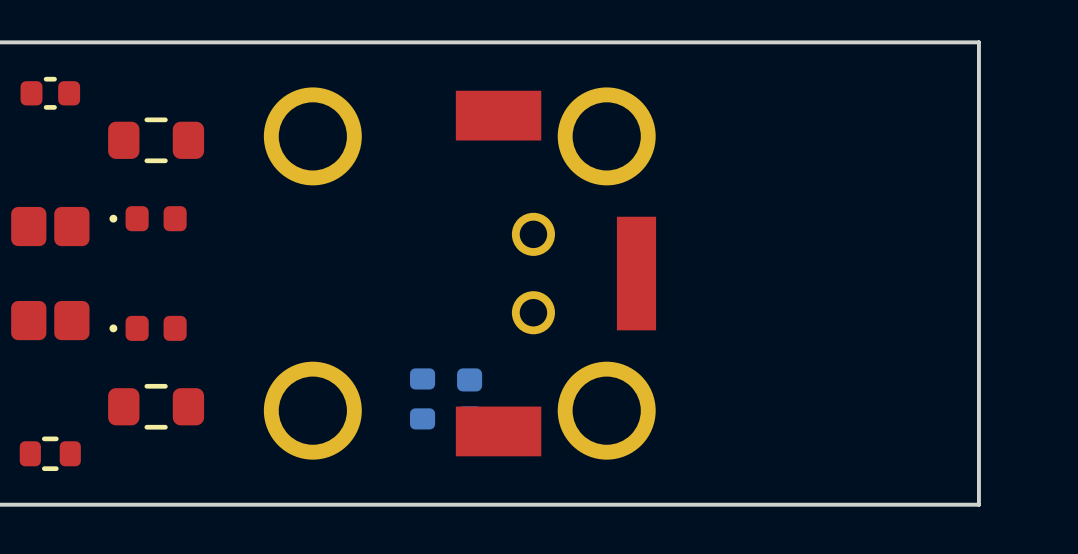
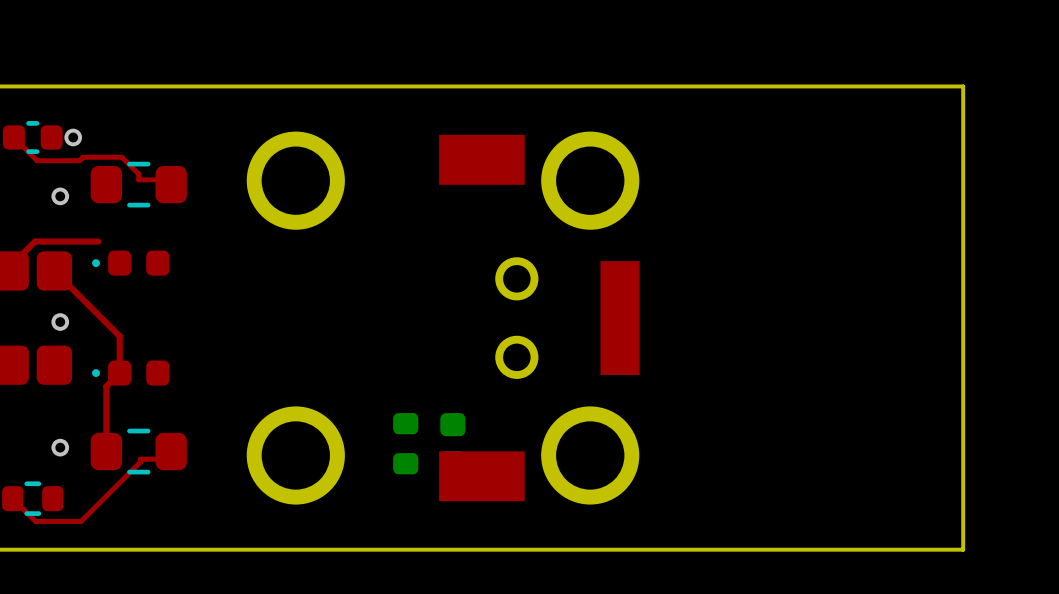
top track: none -> (13, 137) (37, 160) (79, 160) (83, 157) (121, 157) (138, 174) (138, 179) (166, 179) (171, 184)
via: none -> (73, 137)
via: none -> (60, 196)
top track: none -> (98, 241) (35, 241) (11, 265) (11, 270)
top track: none -> (54, 270) (119, 336) (119, 373) (106, 386) (106, 451)
via: none -> (60, 322)
via: none -> (60, 447)
top track: none -> (171, 451) (163, 459) (140, 459) (140, 462) (81, 521) (35, 521) (12, 498)

